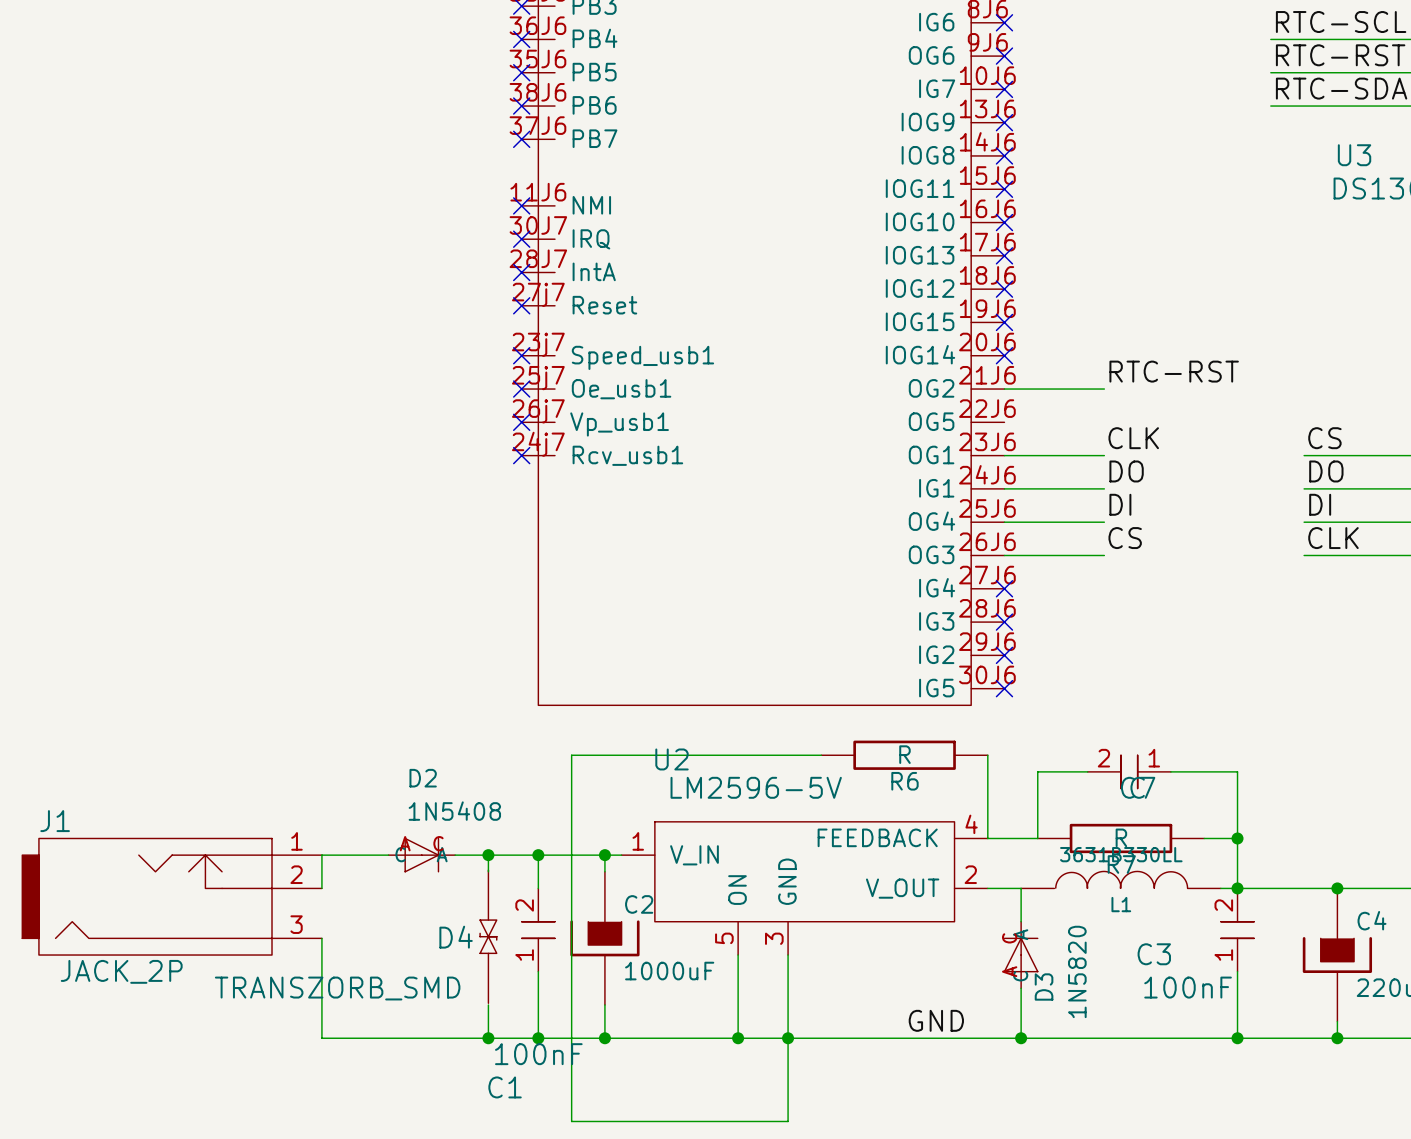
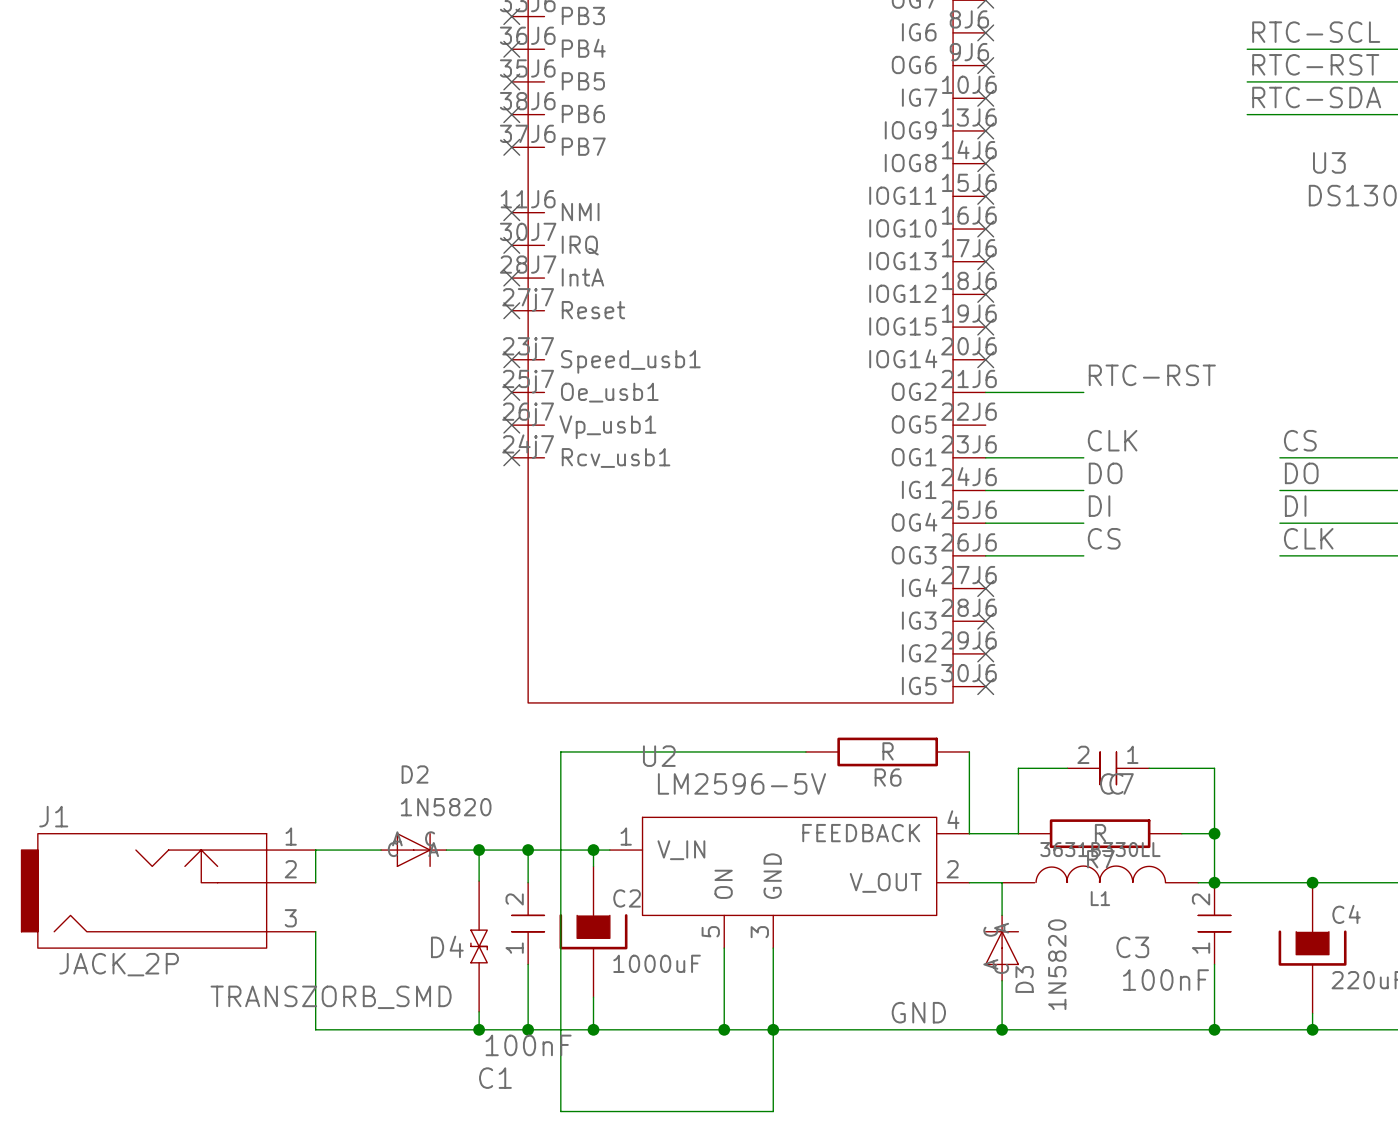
D2 value: 1N5408 (454, 811) -> 1N5820 (446, 807)
D4 position: (488, 936) -> (479, 946)

